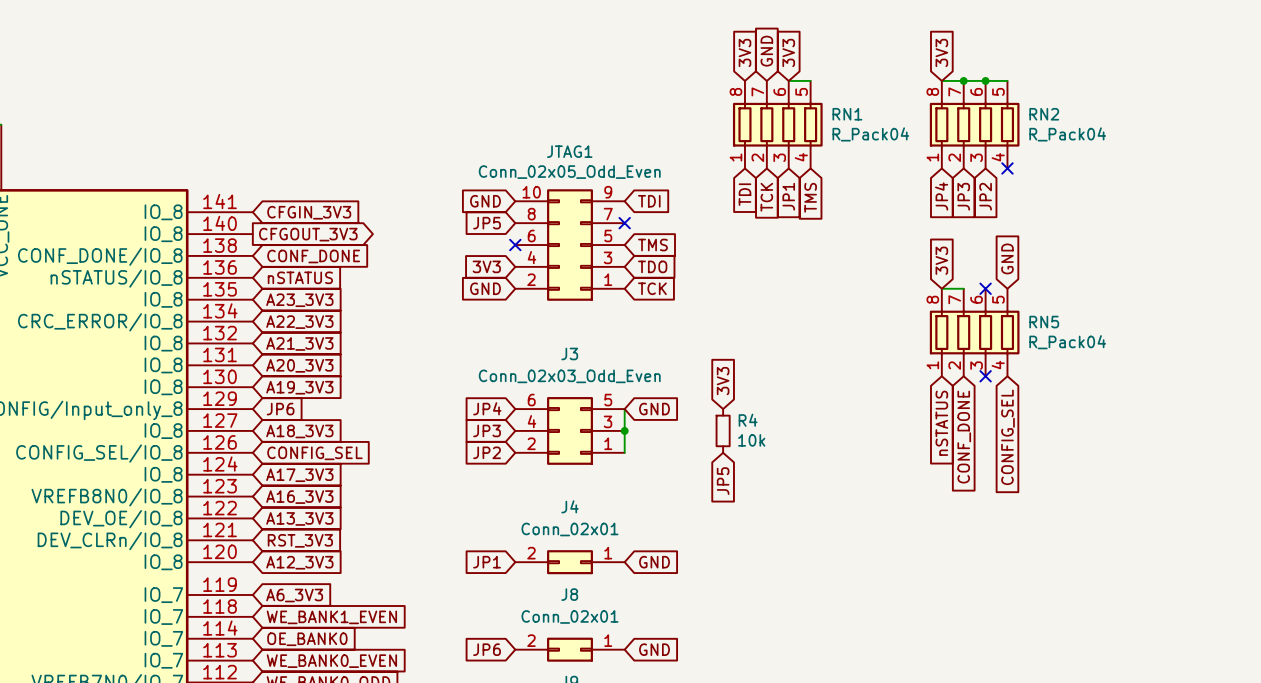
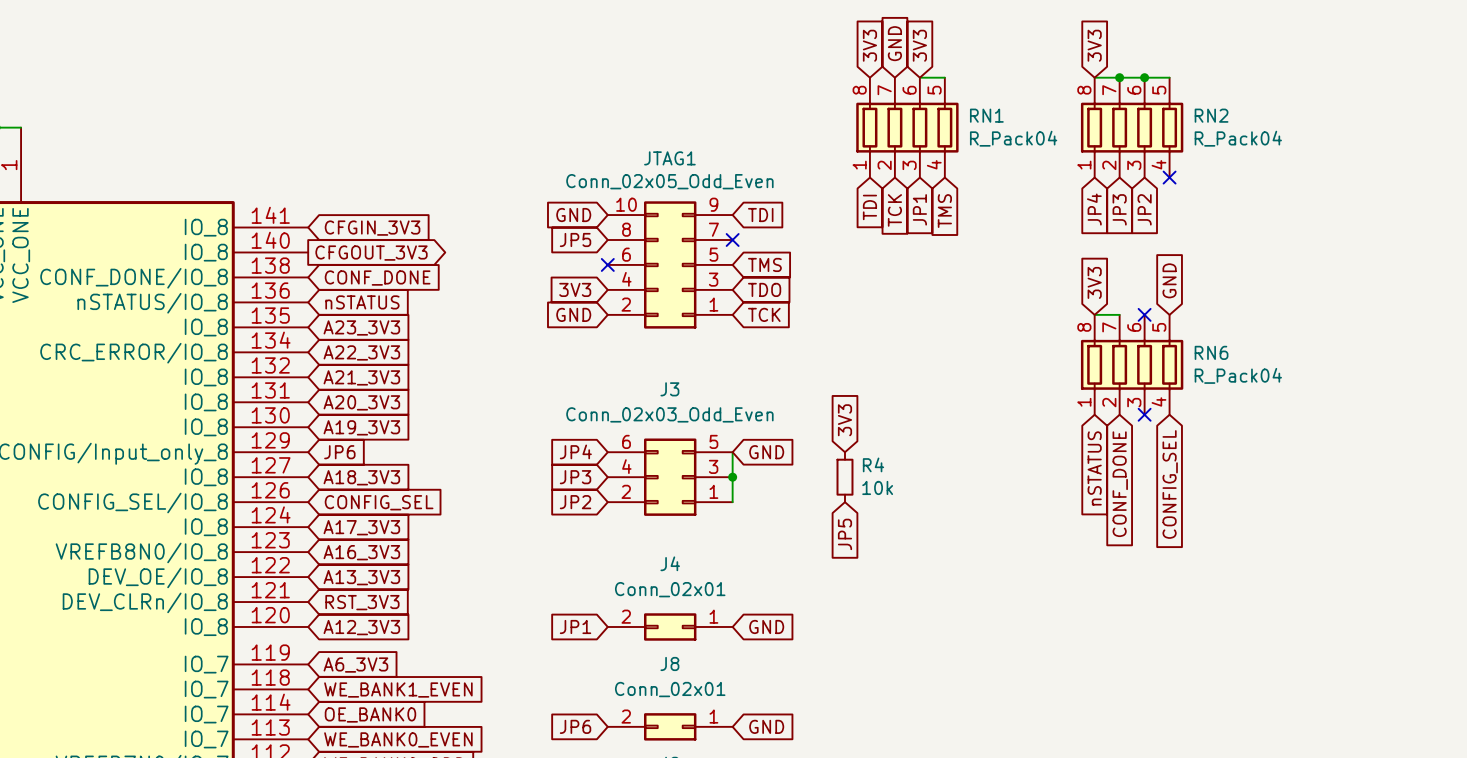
RN5 name: RN5 (1044, 322) -> RN6 (1211, 352)

